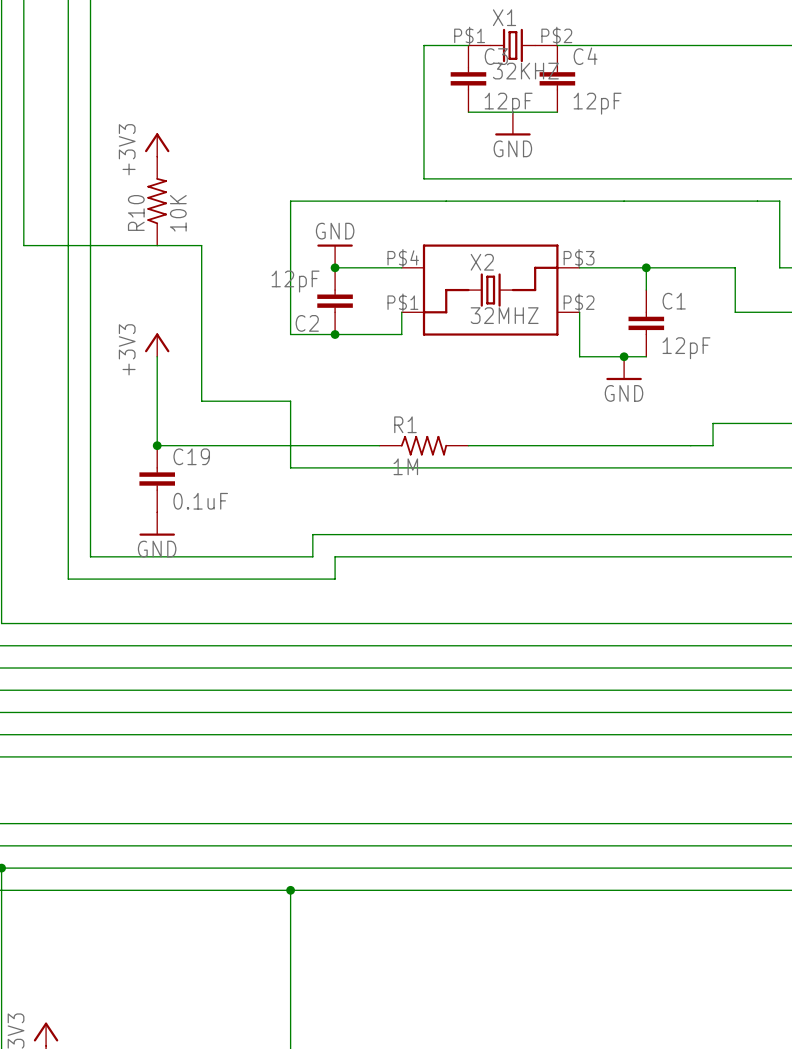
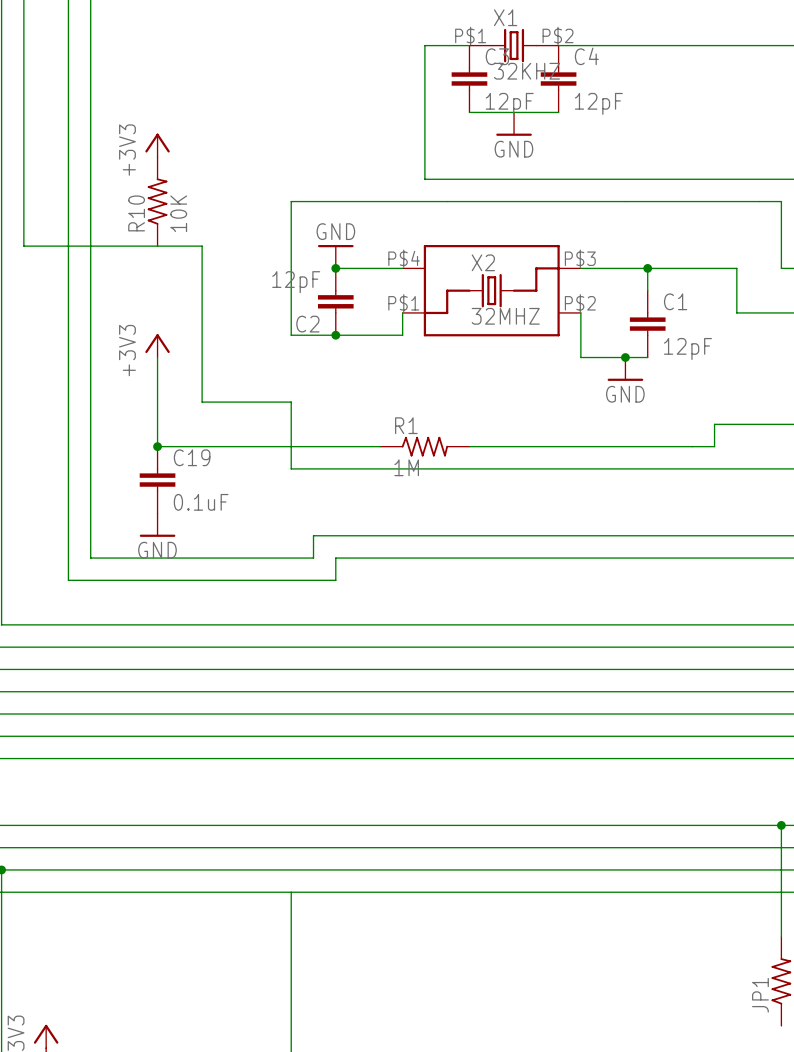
wire: none -> (781, 825) (781, 936)
junction: none -> (781, 825)
junction: (290, 890) -> none
JP1: none -> (781, 981)

